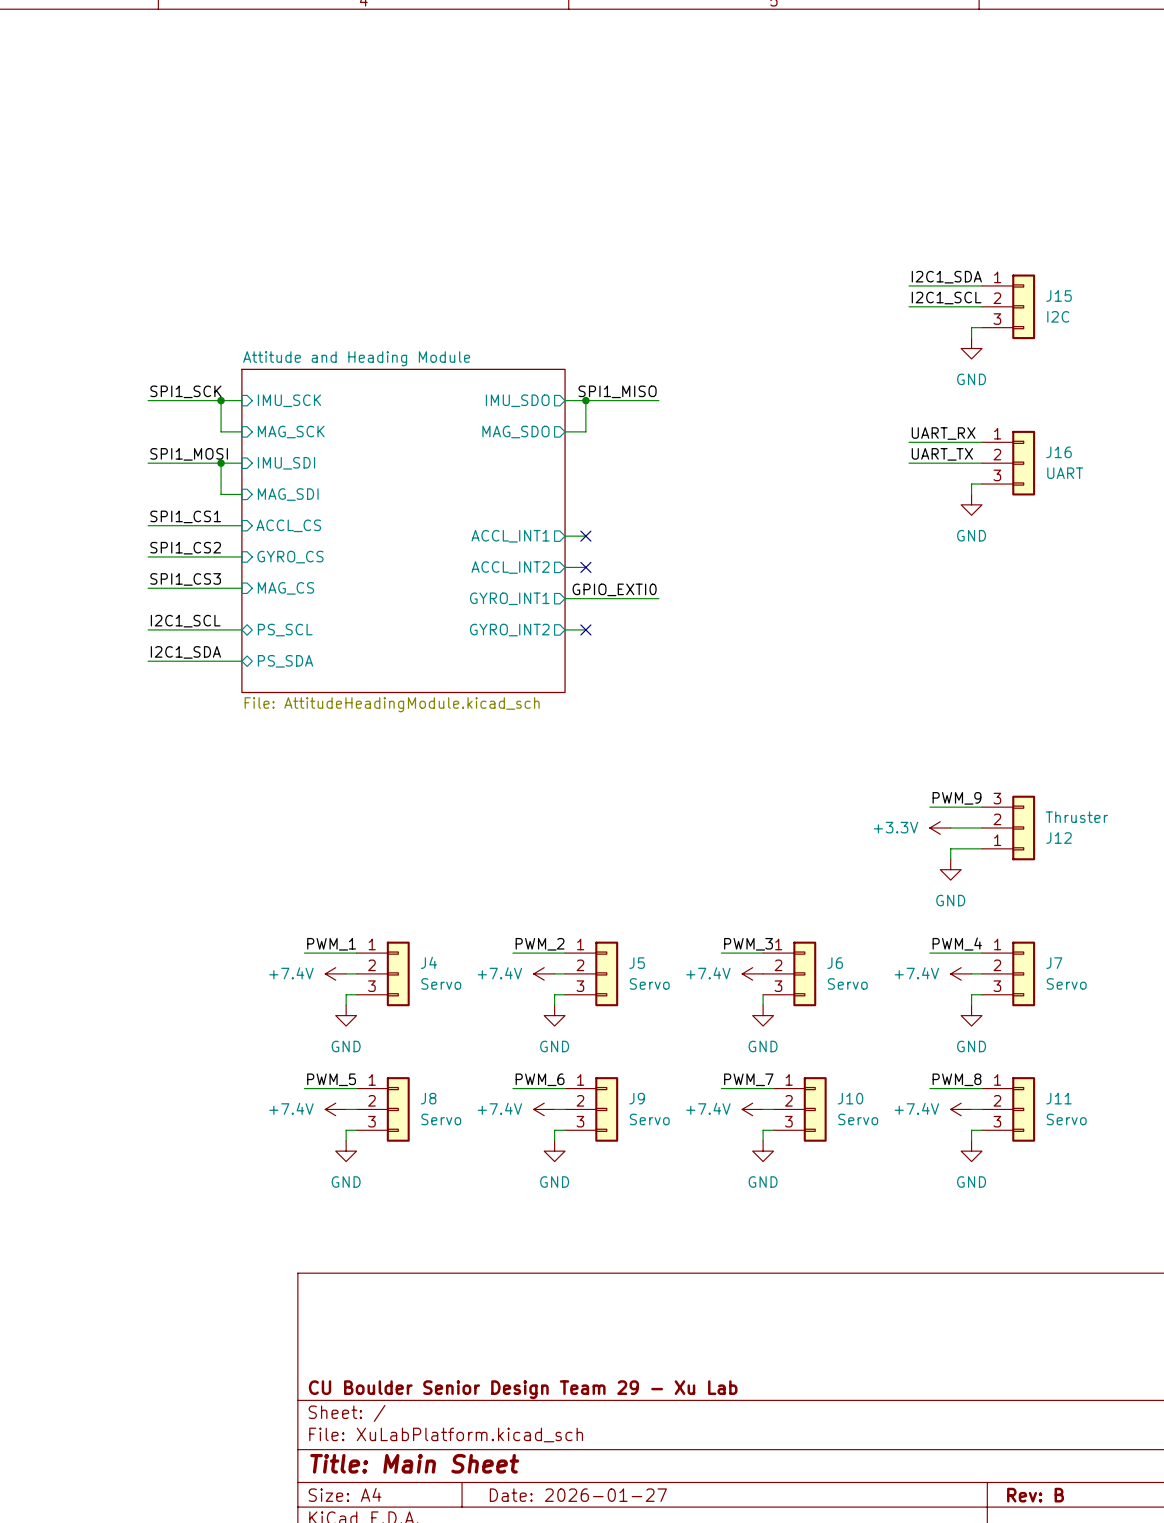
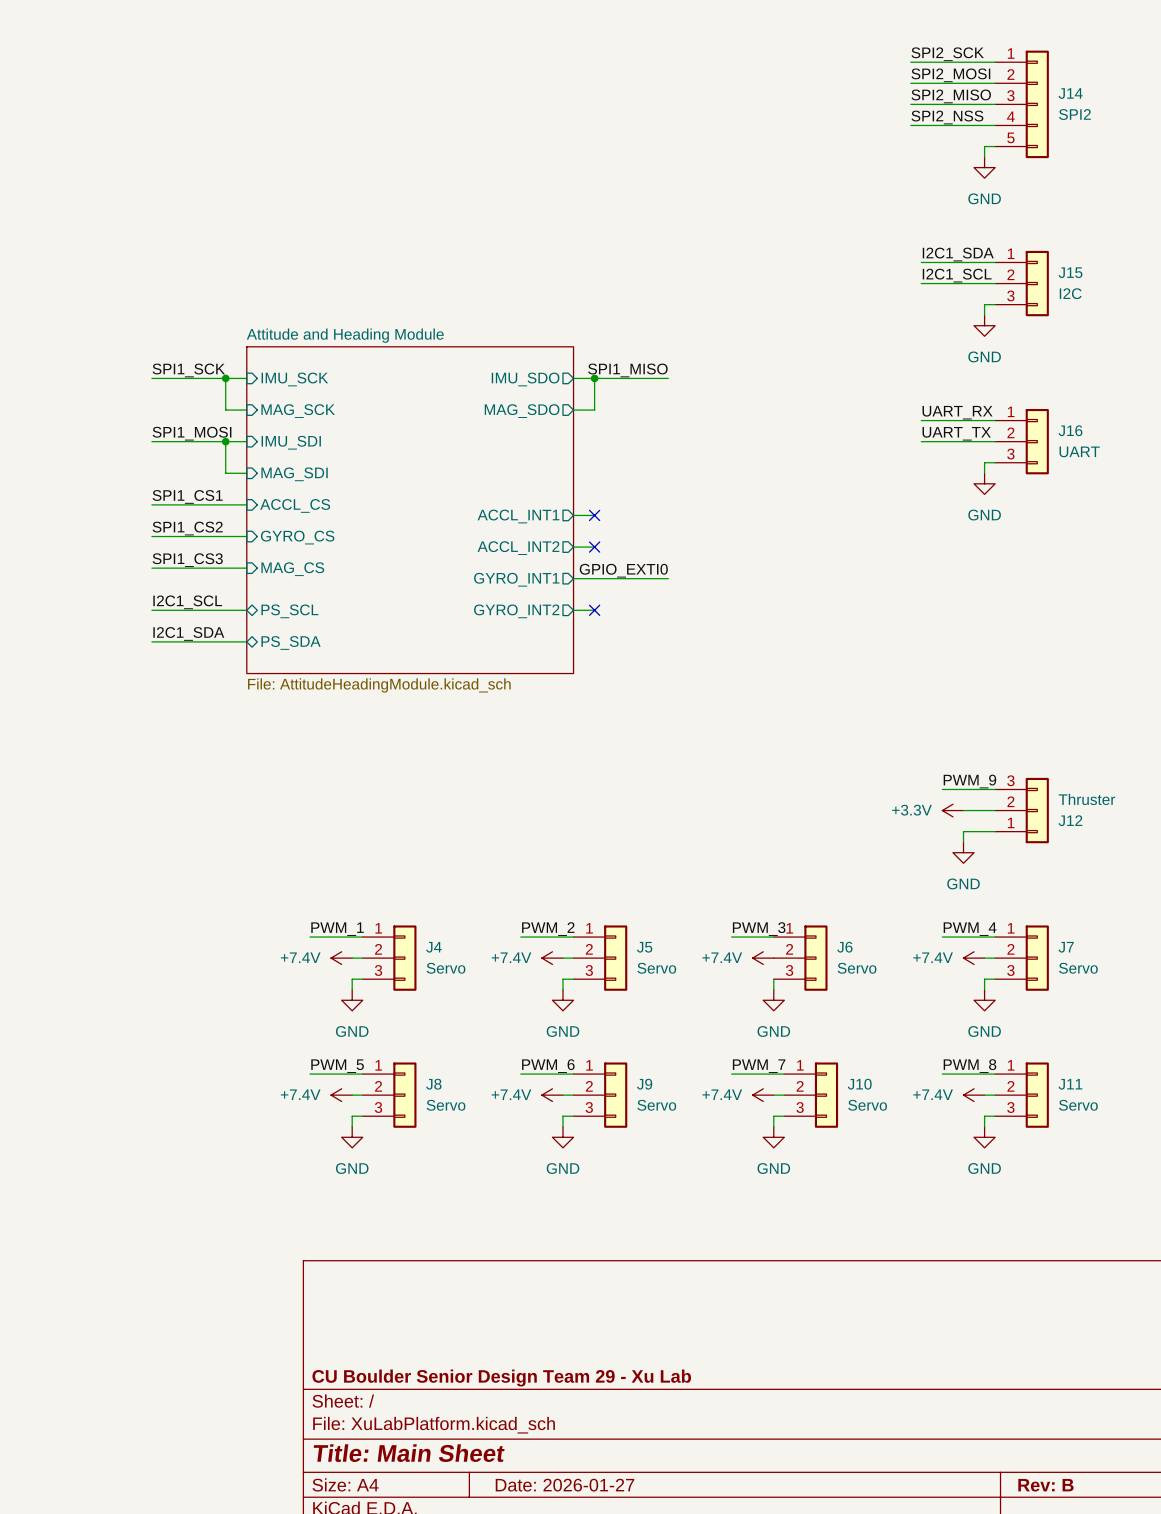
label: none -> SPI2_SCK (947, 54)
wire: none -> (910, 62) (995, 62)
label: none -> SPI2_MOSI (950, 75)
wire: none -> (910, 83) (995, 83)
label: none -> SPI2_MISO (951, 96)
wire: none -> (910, 104) (995, 104)
J14: none -> SPI2 (1022, 104)
label: none -> SPI2_NSS (947, 117)
wire: none -> (910, 125) (995, 125)
wire: none -> (995, 146) (984, 146) (984, 157)
power symbol: none -> GND (984, 167)

